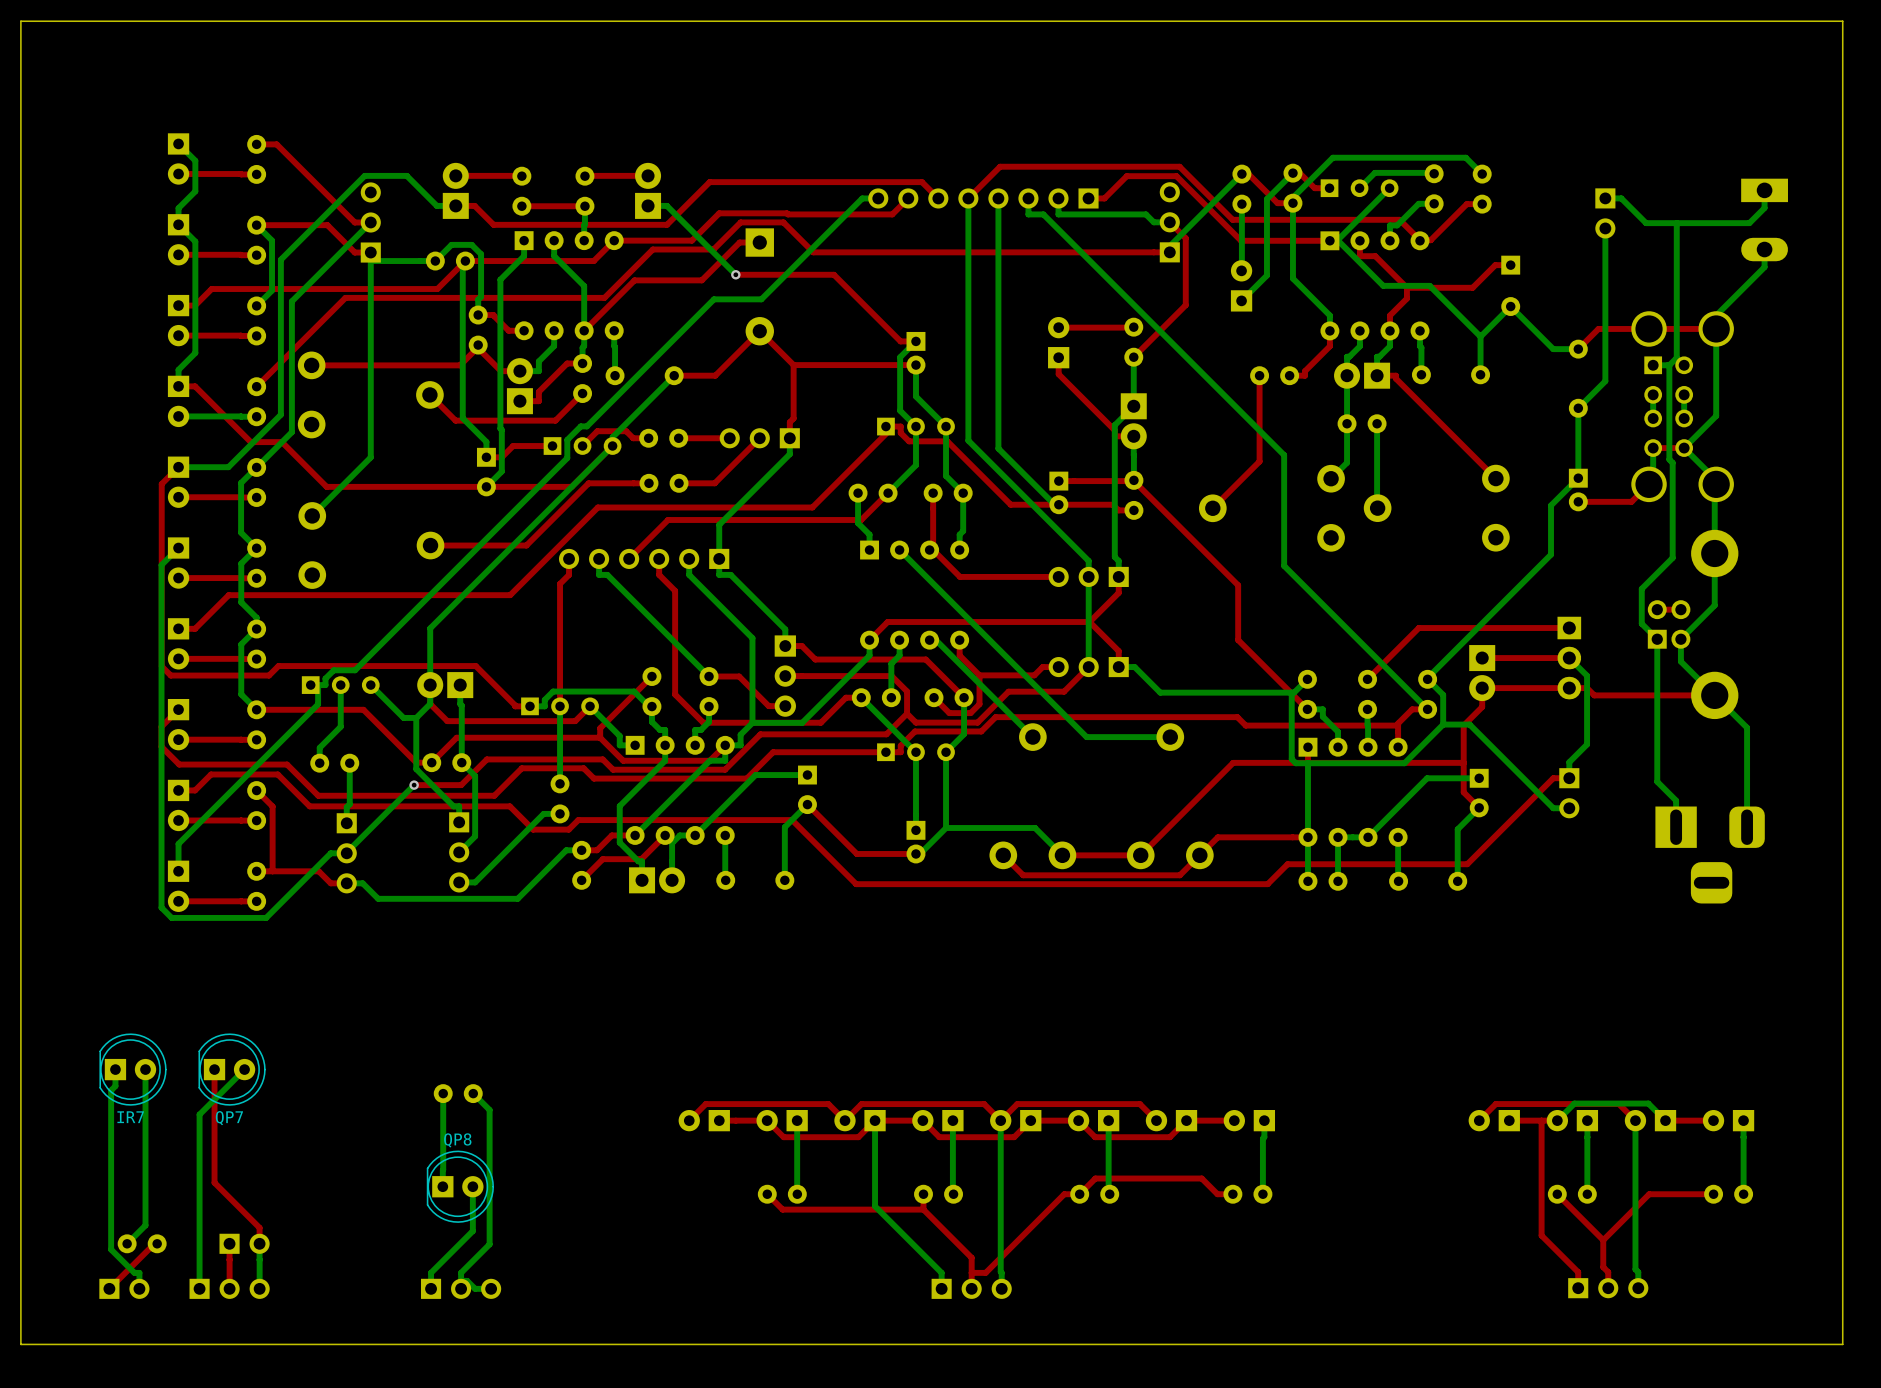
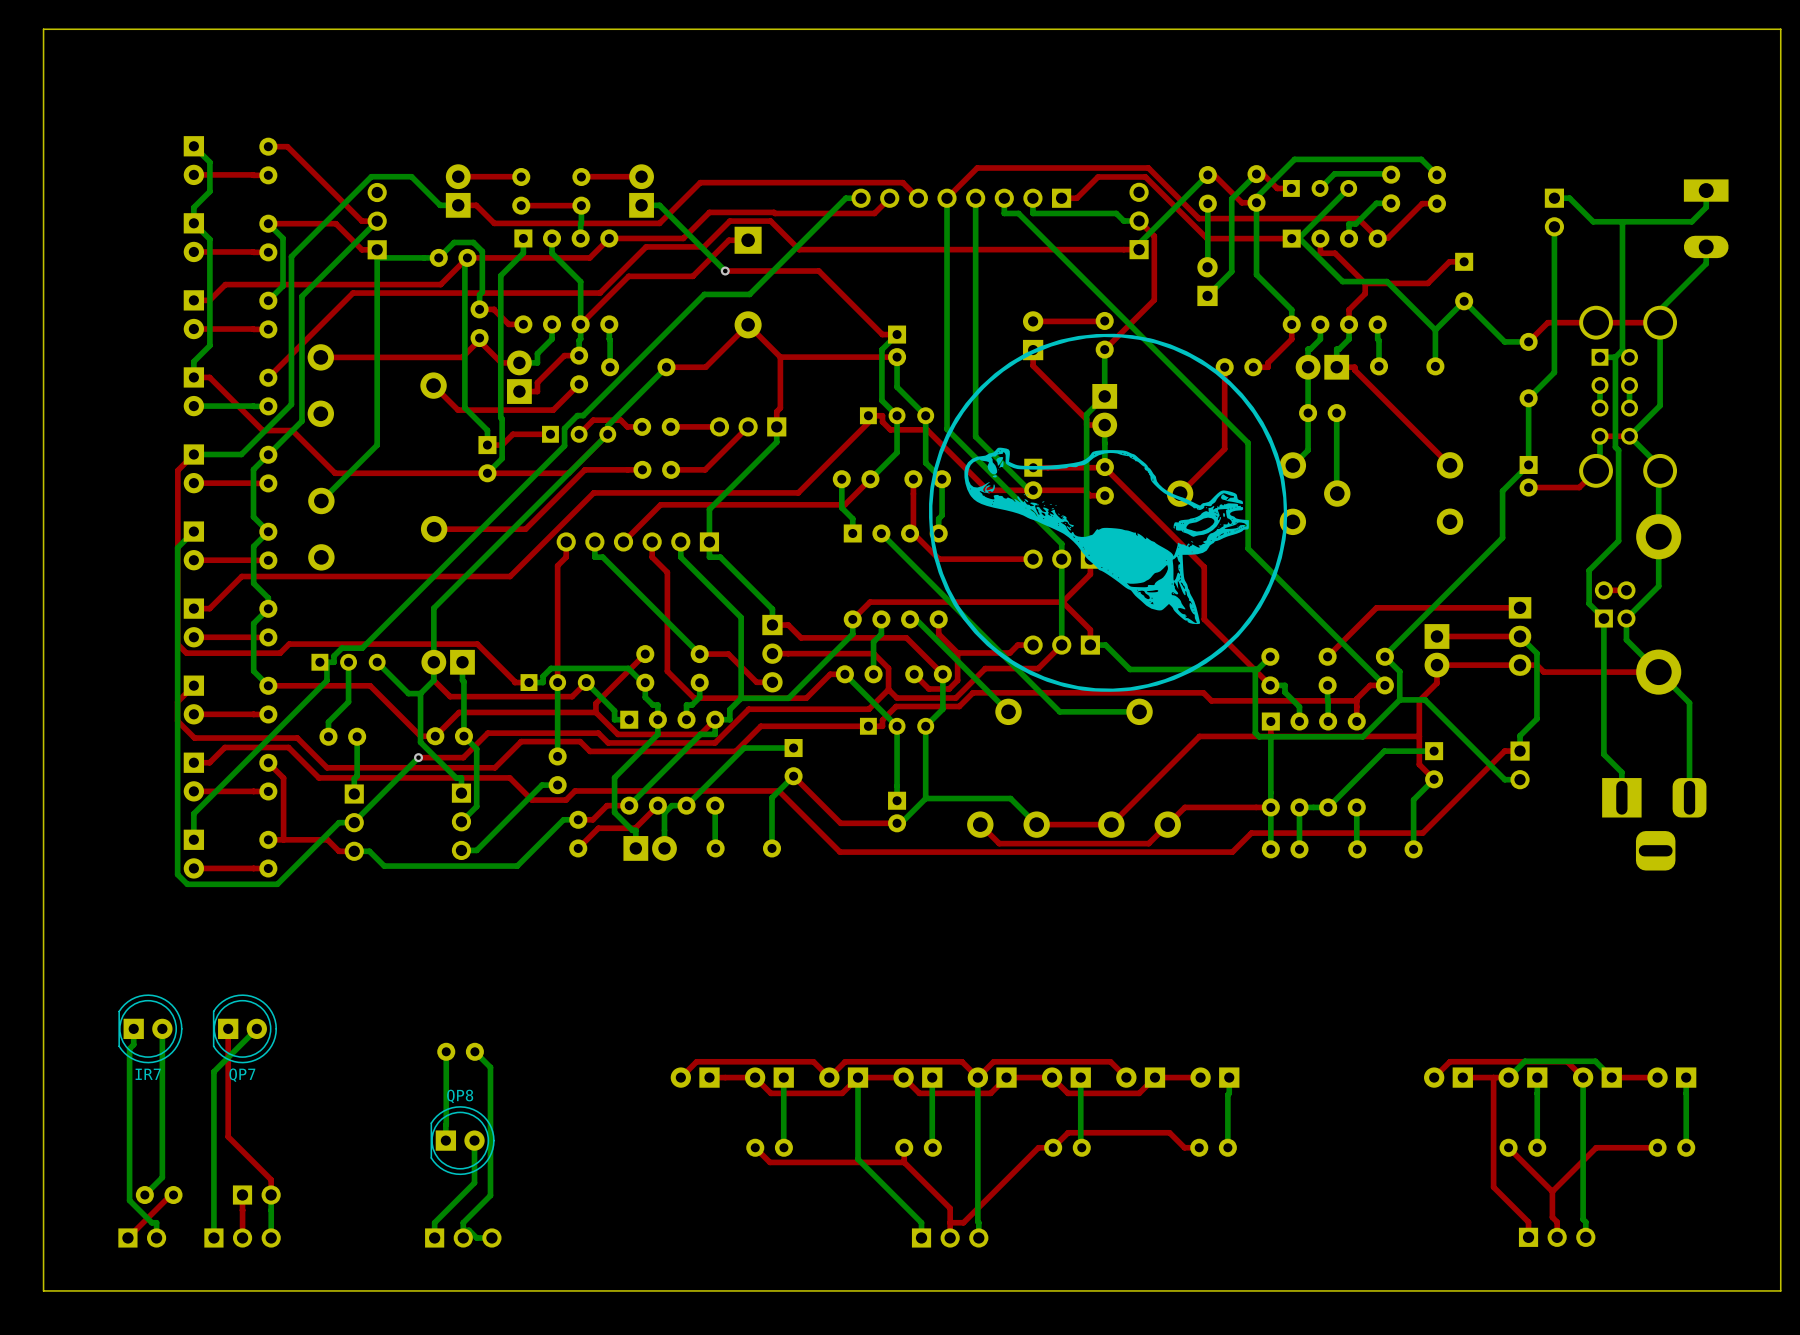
drawing: none -> [929, 333, 1288, 692]

